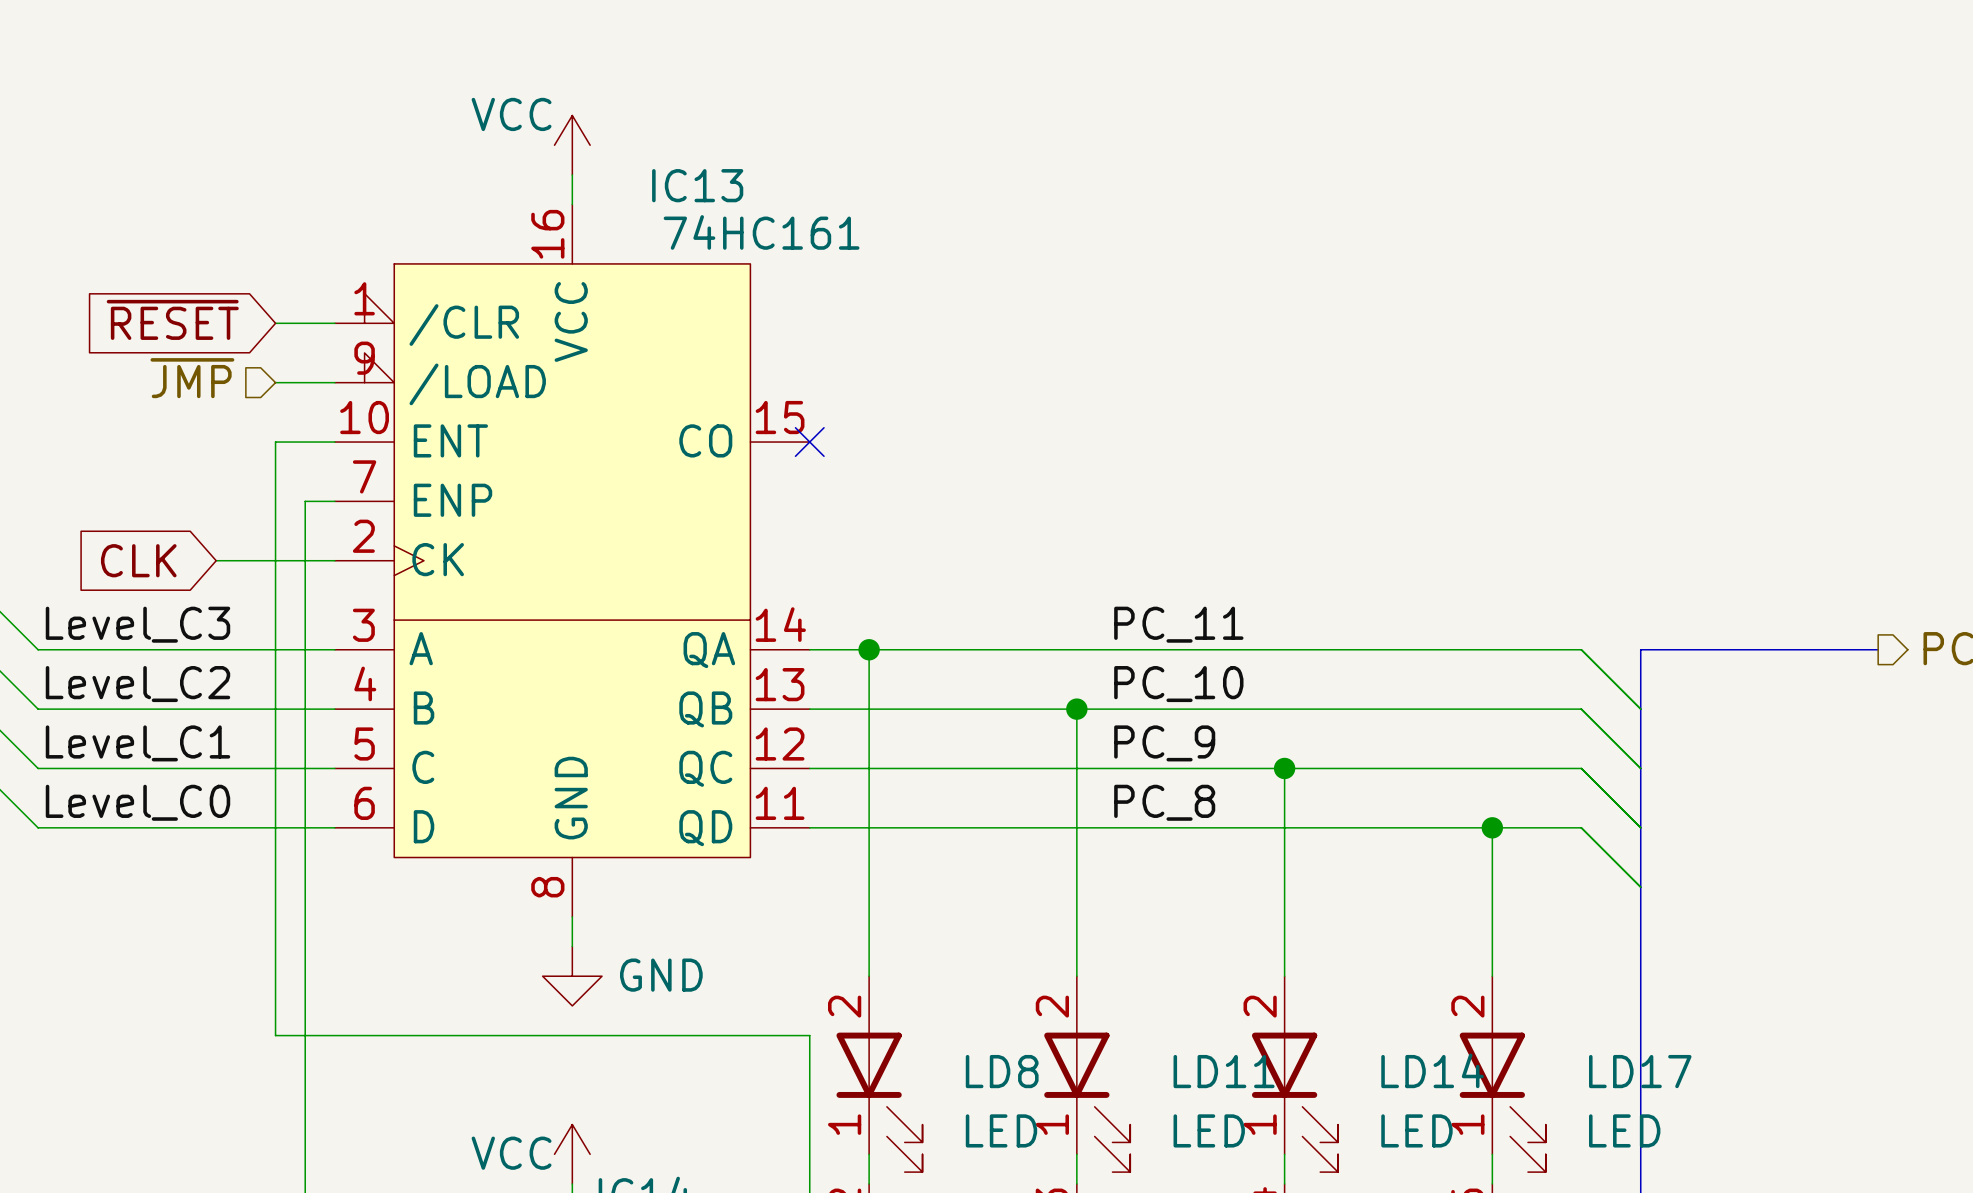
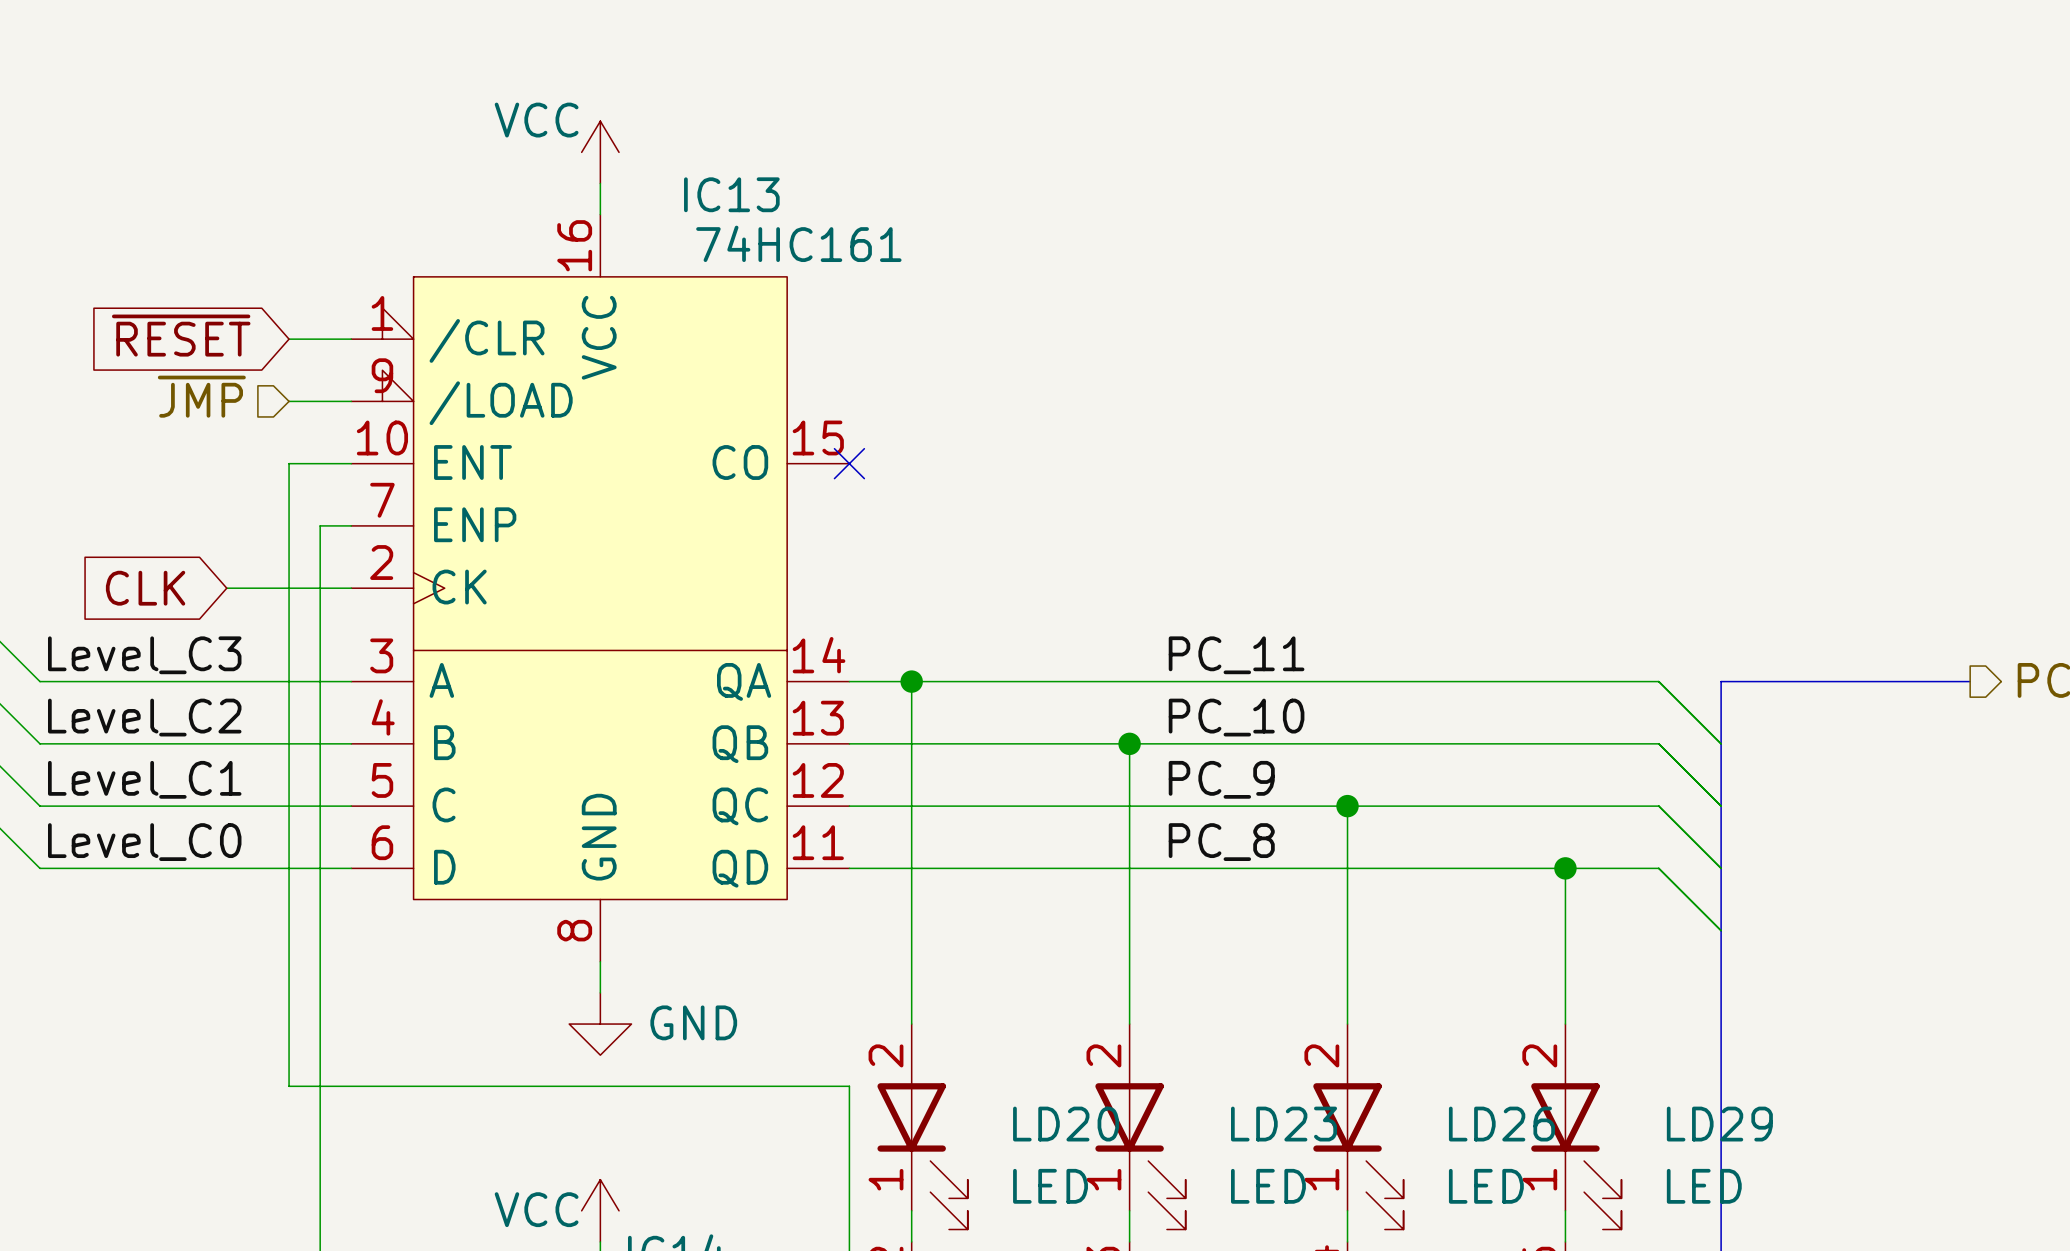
LD14 name: LD14 (1432, 1070) -> LD26 (1501, 1124)
LD8 name: LD8 (1002, 1071) -> LD20 (1066, 1124)
LD11 name: LD11 (1224, 1071) -> LD23 (1284, 1124)
LD17 name: LD17 (1640, 1071) -> LD29 (1719, 1124)

